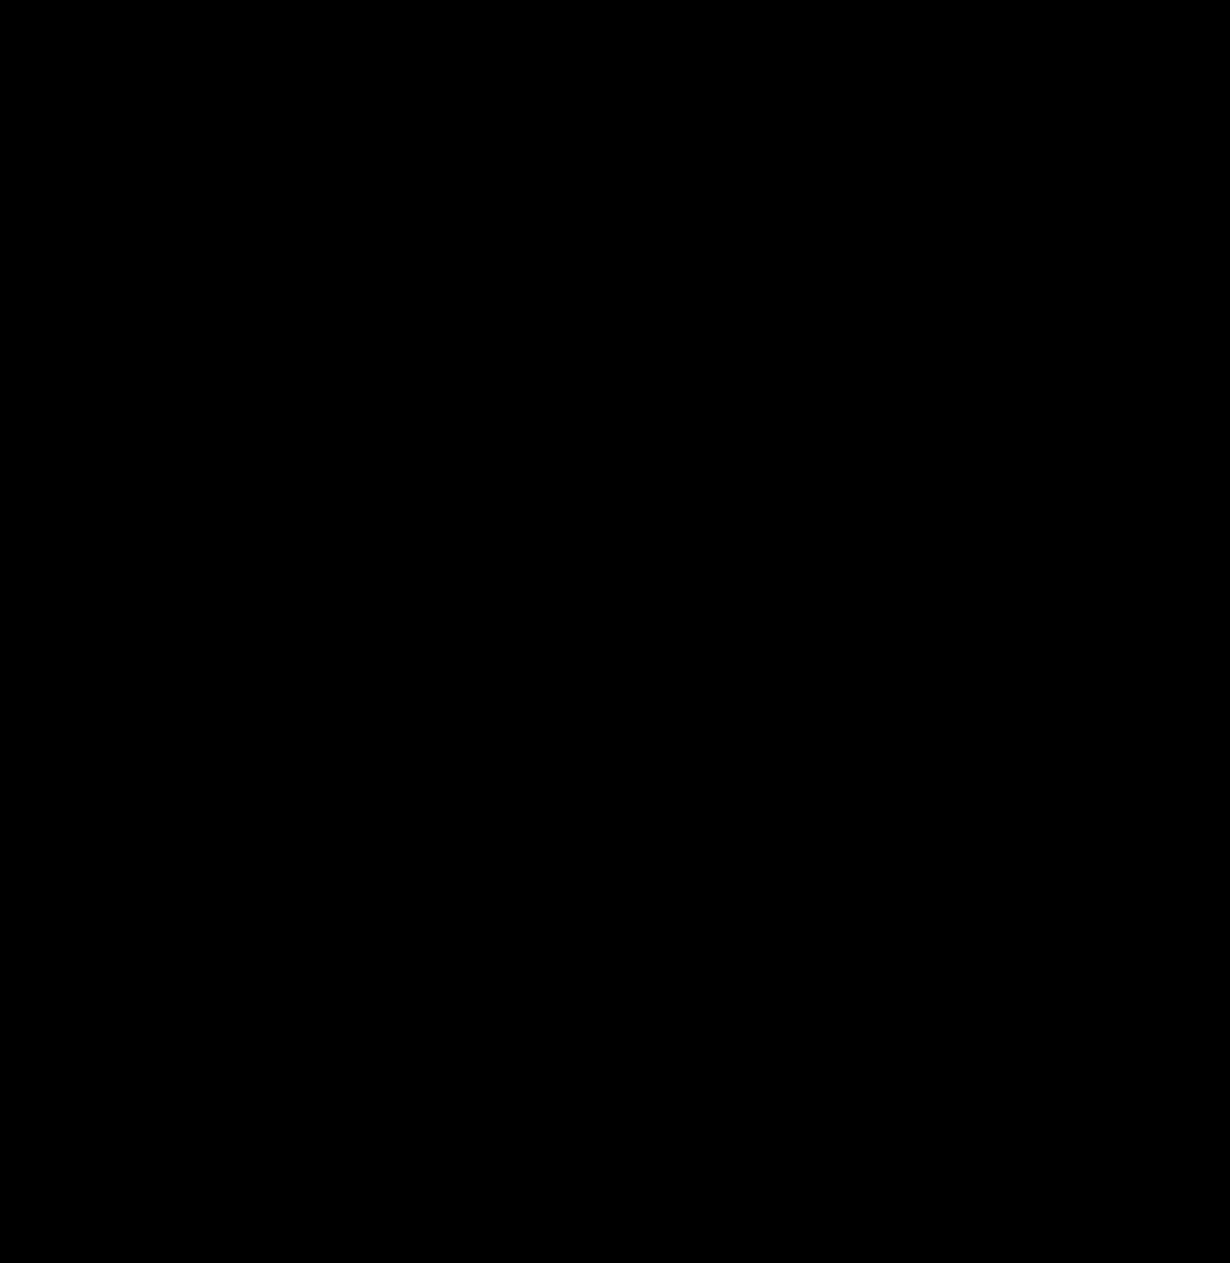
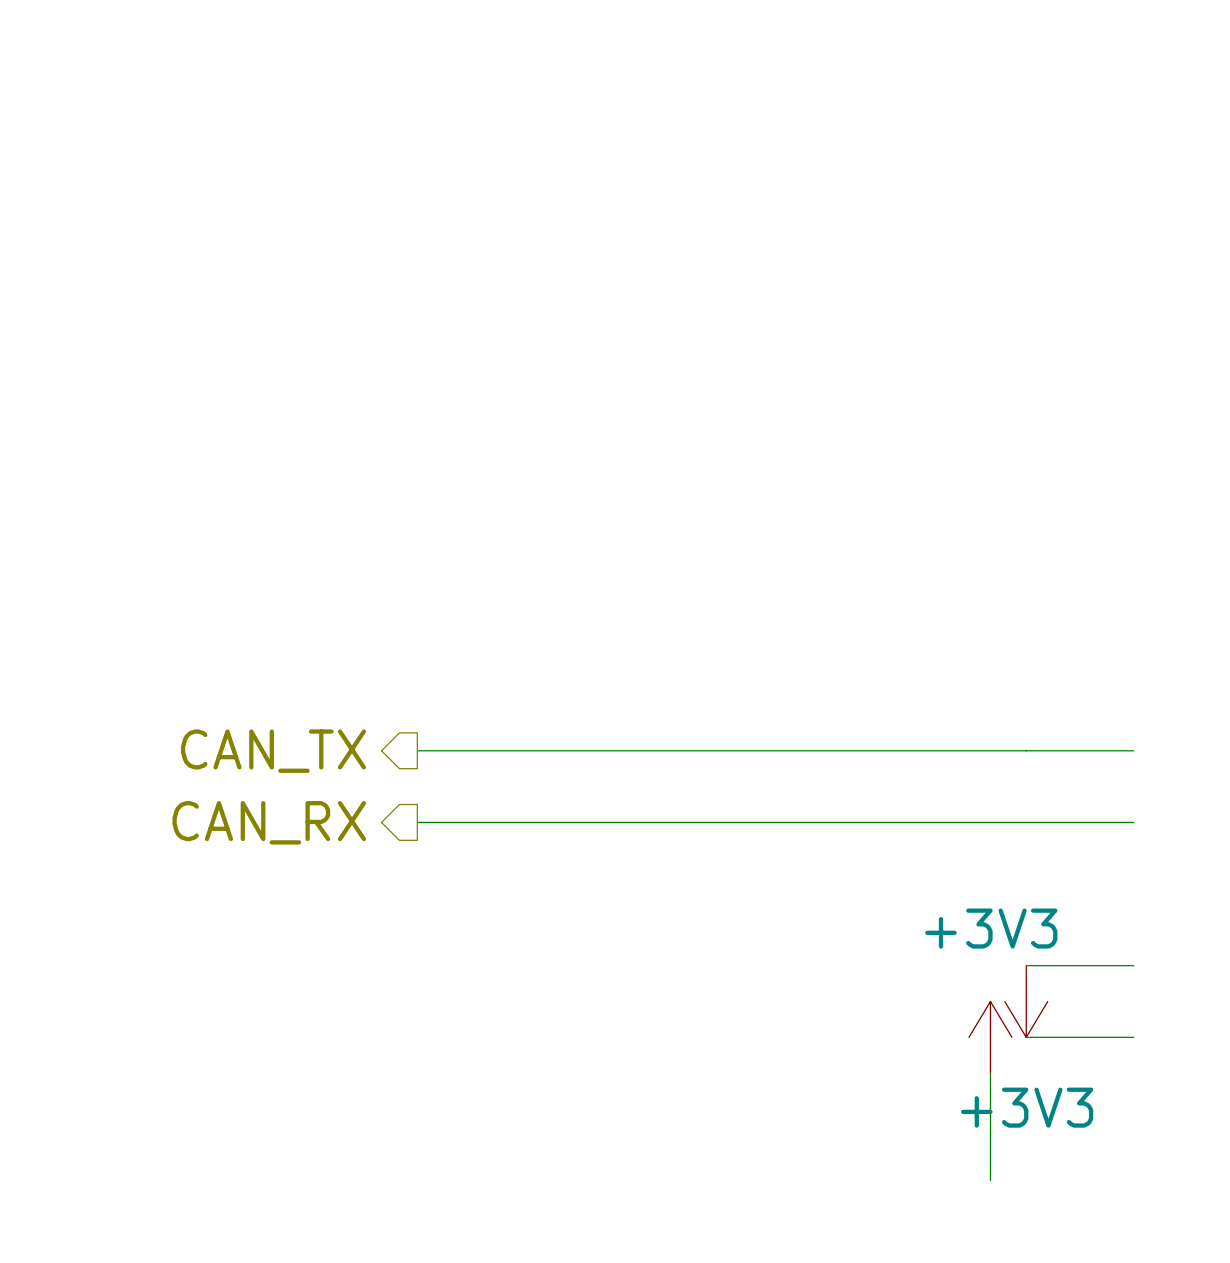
wire: none -> (417, 750) (1133, 750)
hierarchical label: none -> CAN_TX (273, 751)
wire: none -> (417, 822) (1133, 822)
hierarchical label: none -> CAN_RX (269, 822)
wire: none -> (1026, 965) (1133, 965)
power symbol: none -> +3V3 (1026, 1001)
power symbol: none -> +3V3 (990, 1037)
wire: none -> (1026, 1037) (1133, 1037)
wire: none -> (990, 1073) (990, 1180)

